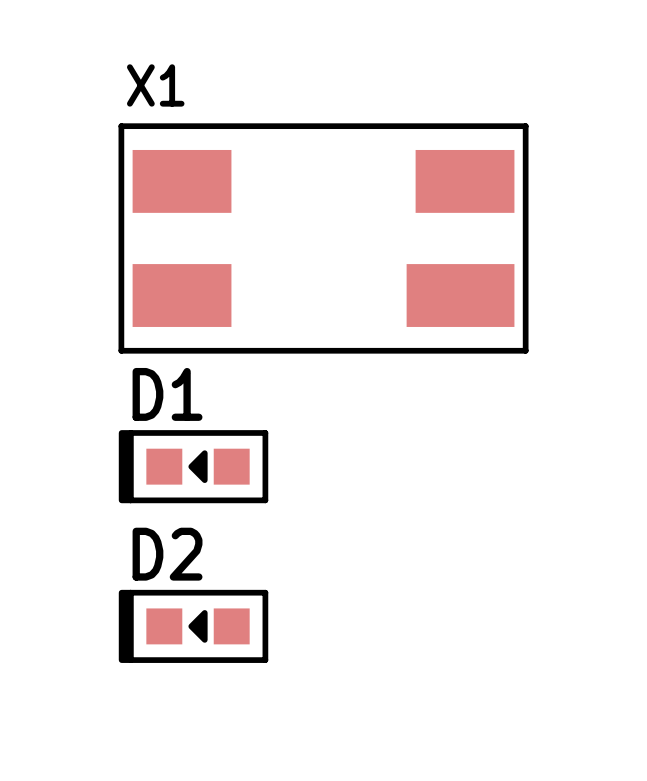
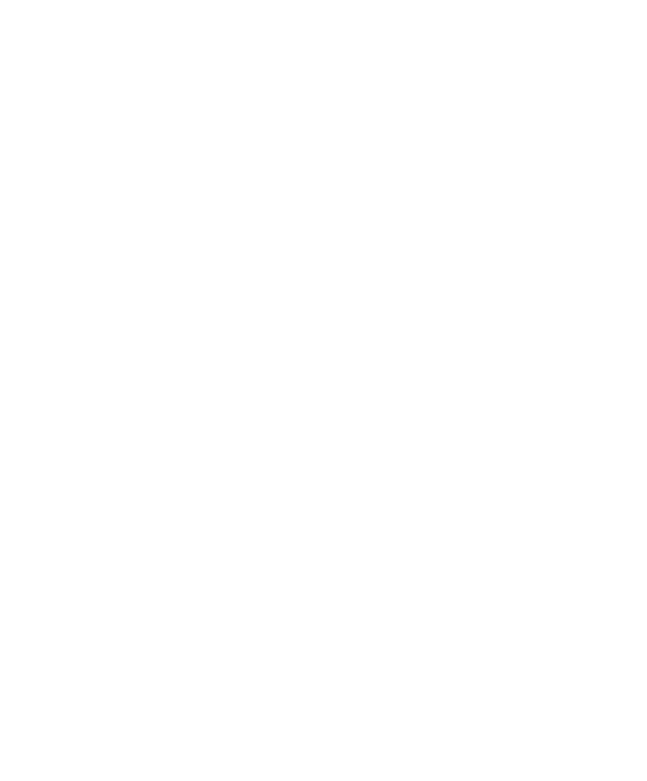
X1: (323, 238) -> none
D1: (193, 466) -> none
D2: (193, 626) -> none

